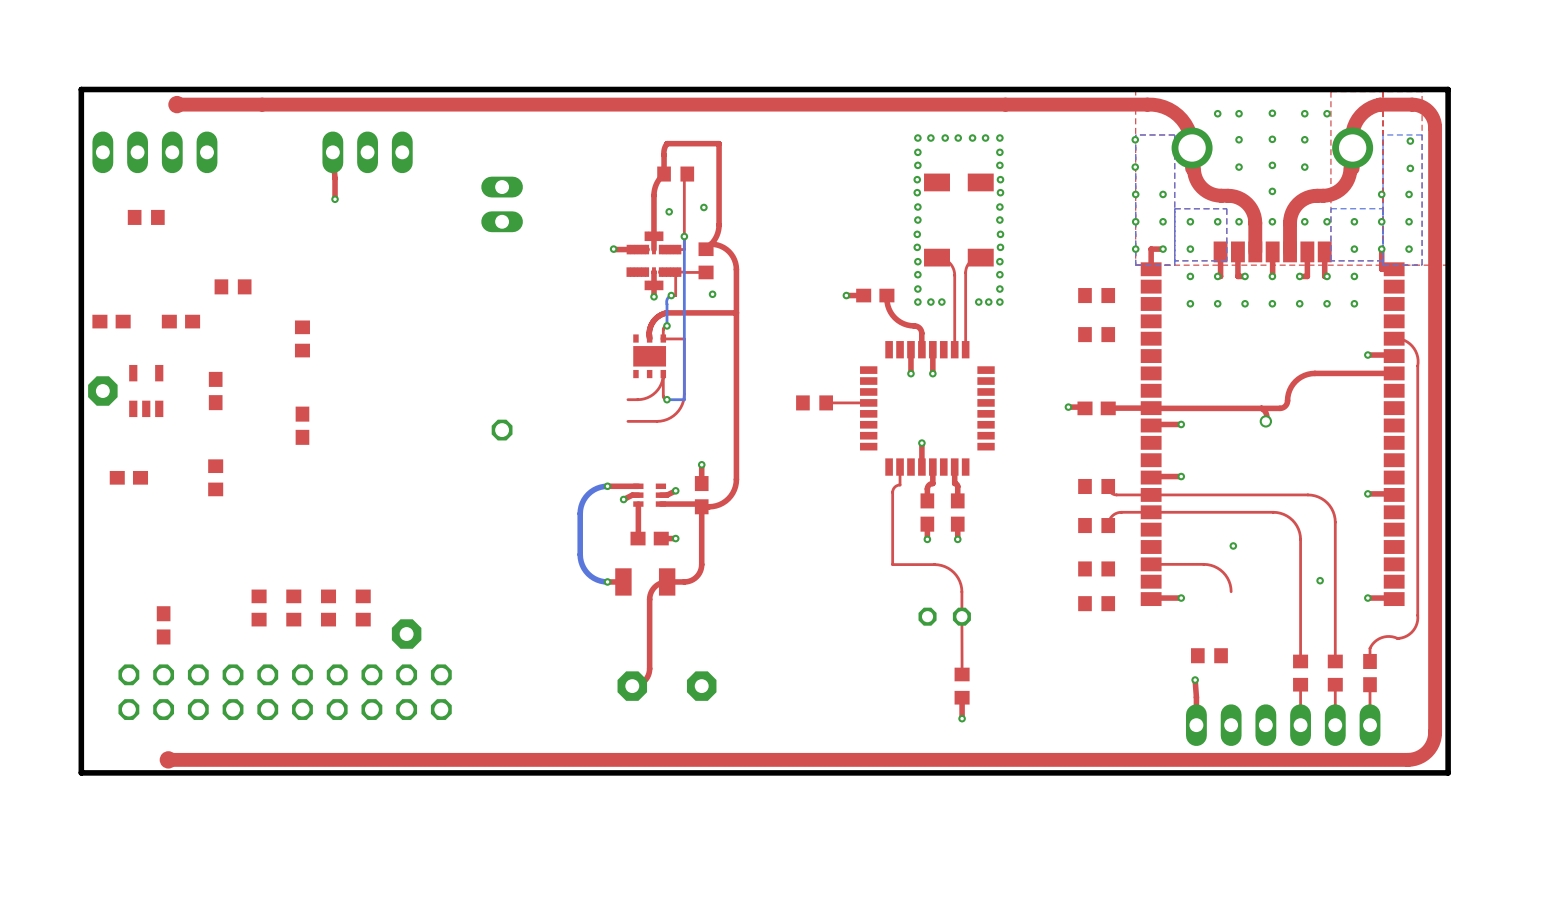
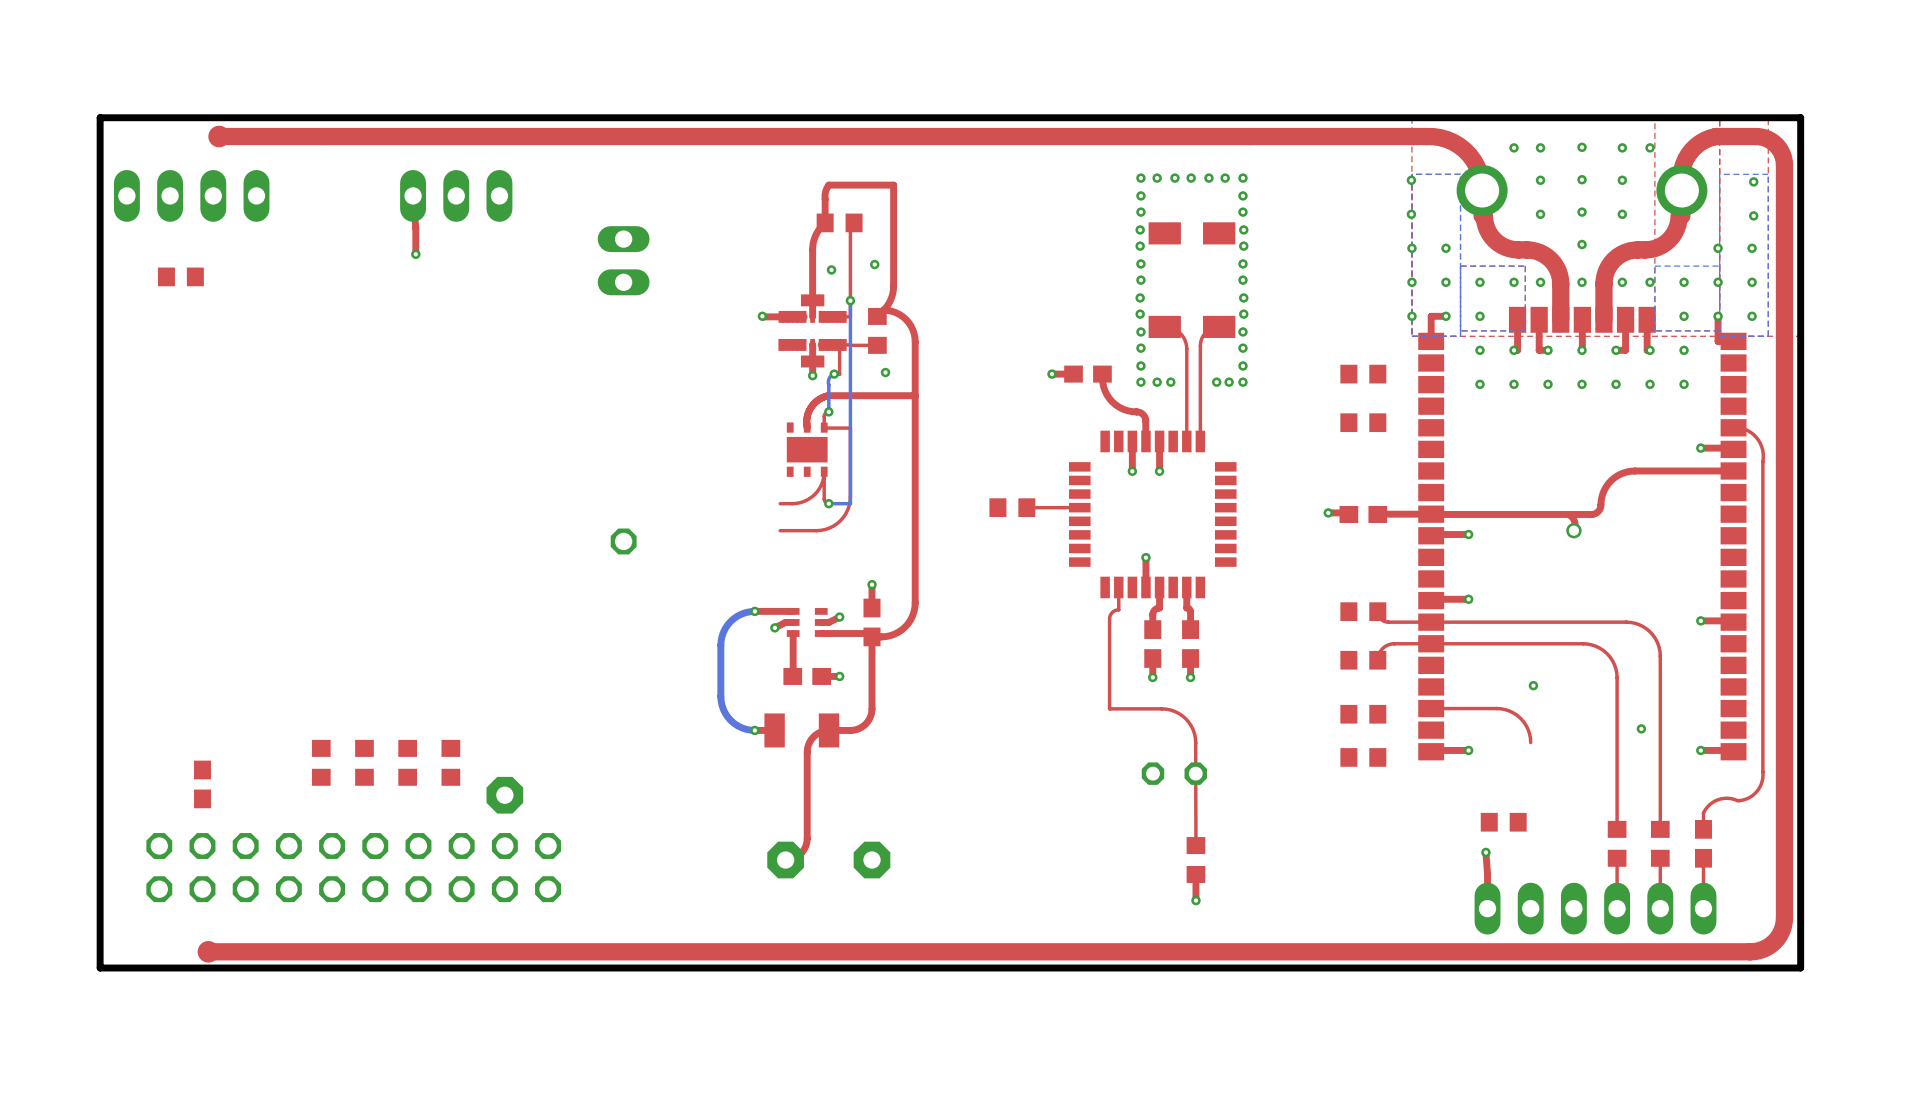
part: (233, 286) -> none
part: (111, 321) -> none
part: (180, 321) -> none
part: (302, 338) -> none
part: (102, 391) -> none
part: (146, 391) -> none
part: (215, 391) -> none
part: (302, 425) -> none
part: (128, 477) -> none
part: (215, 477) -> none

